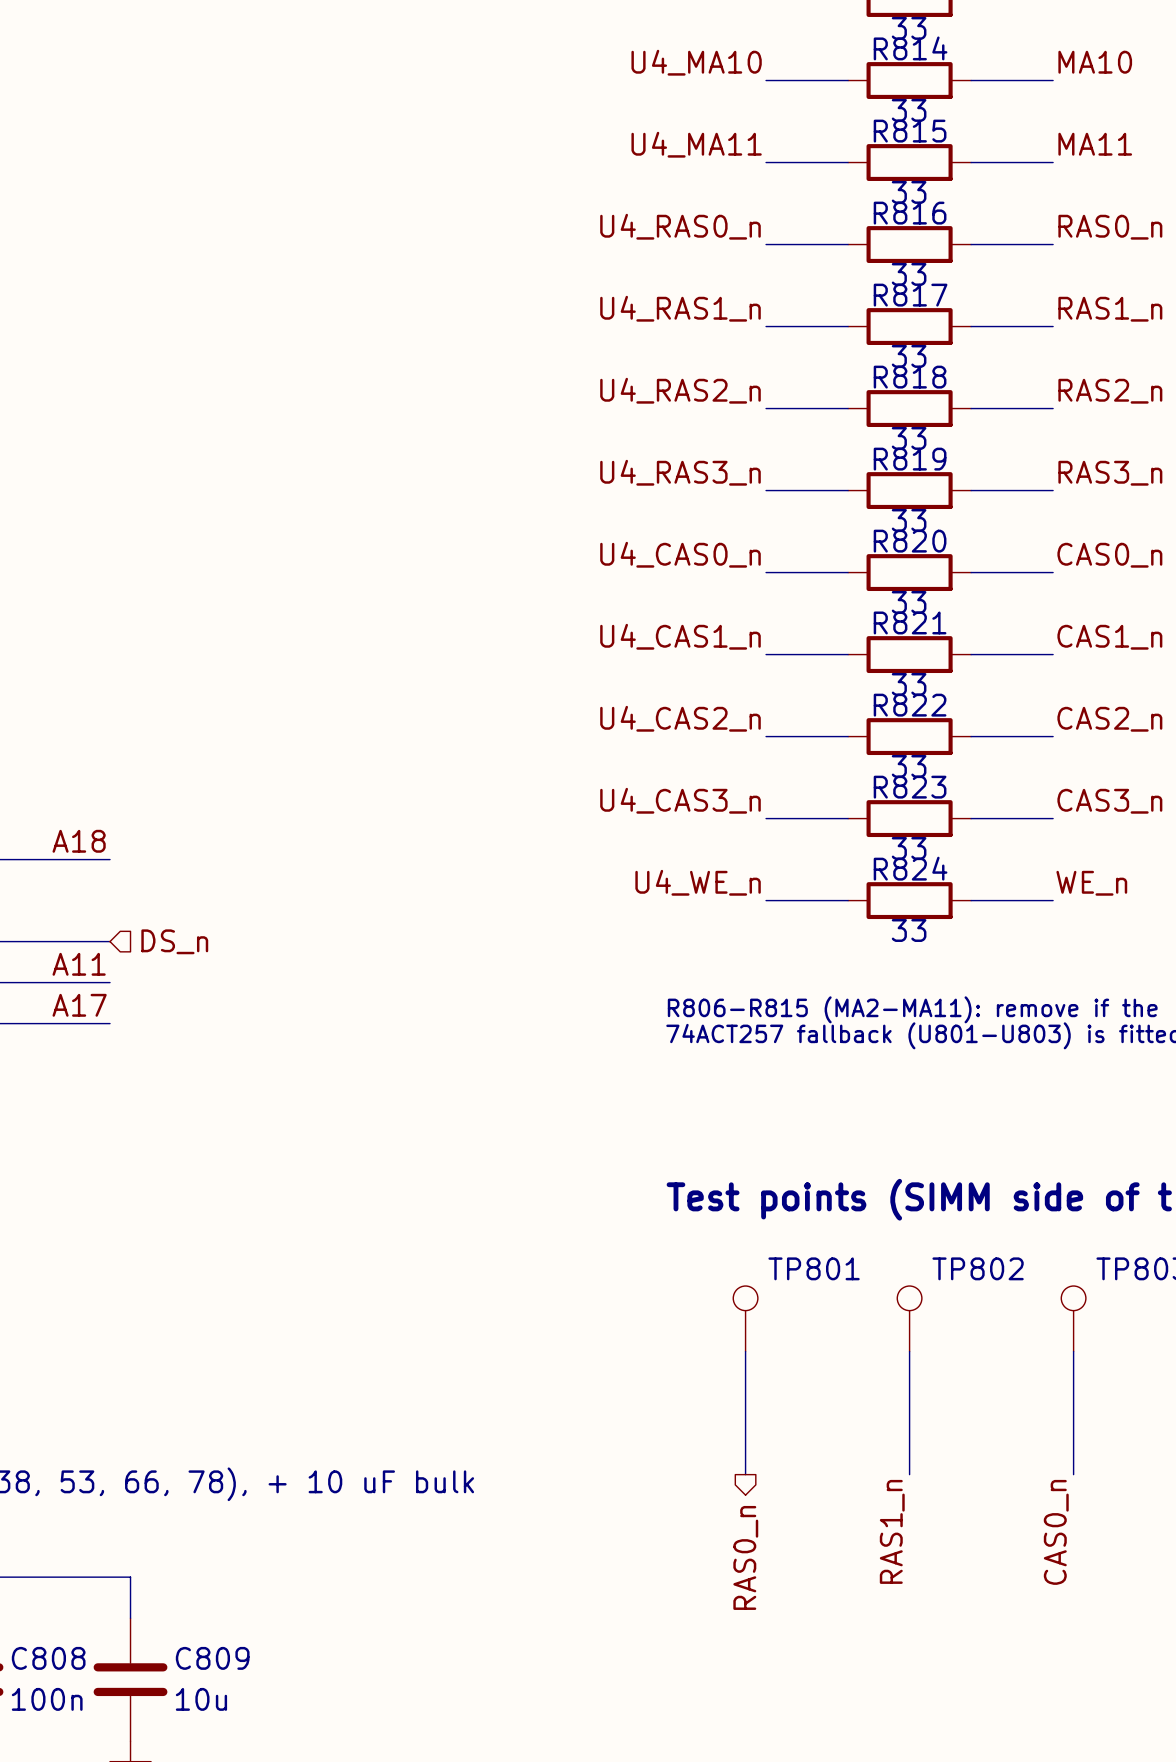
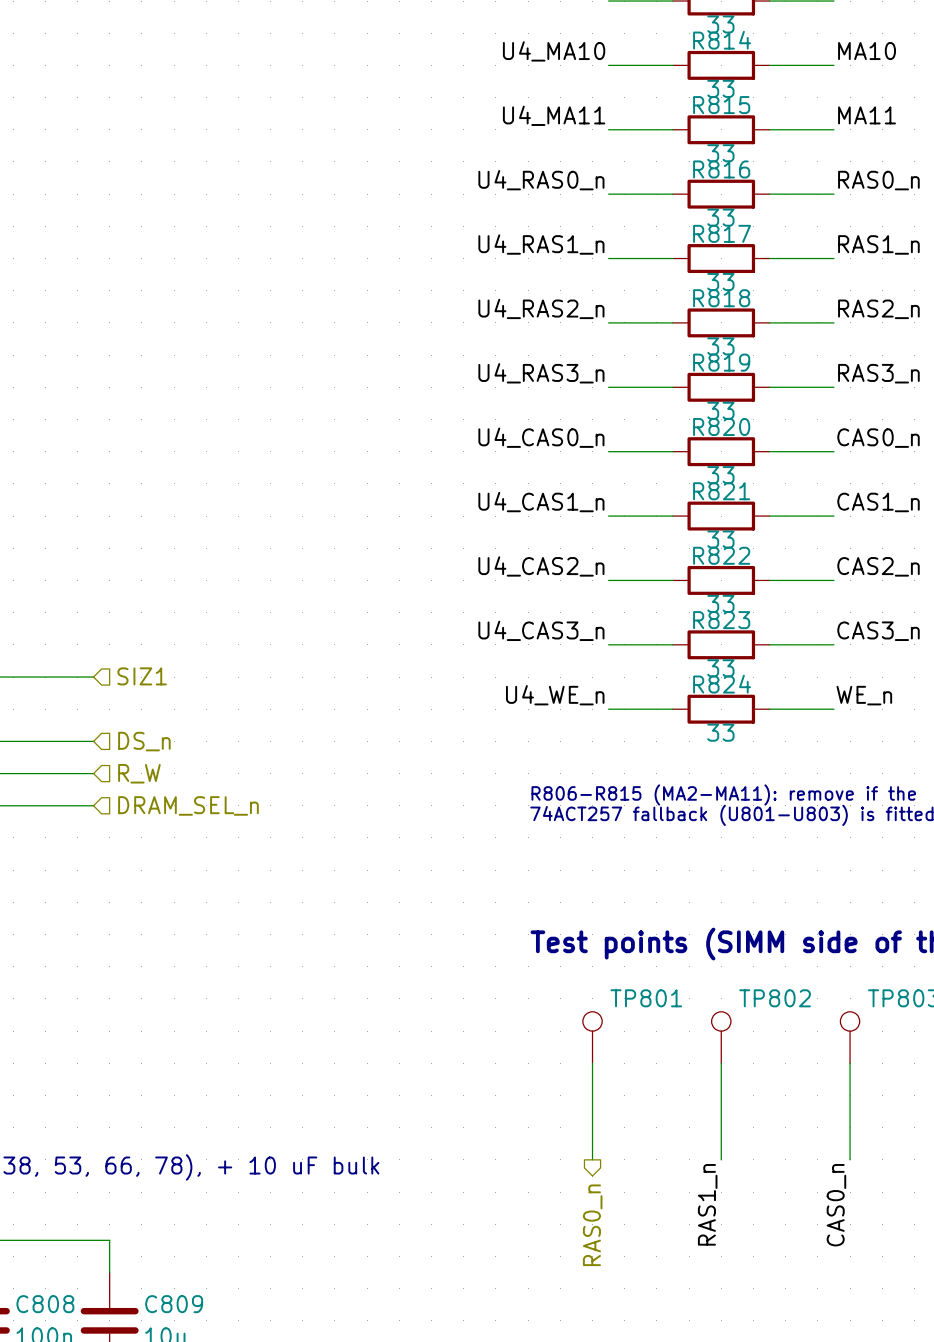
label: A18 (79, 841) -> none
hierarchical label: none -> SIZ1 (142, 676)
label: A11 (79, 964) -> none
hierarchical label: none -> R_W (139, 773)
label: A17 (79, 1005) -> none
hierarchical label: none -> DRAM_SEL_n (188, 805)

